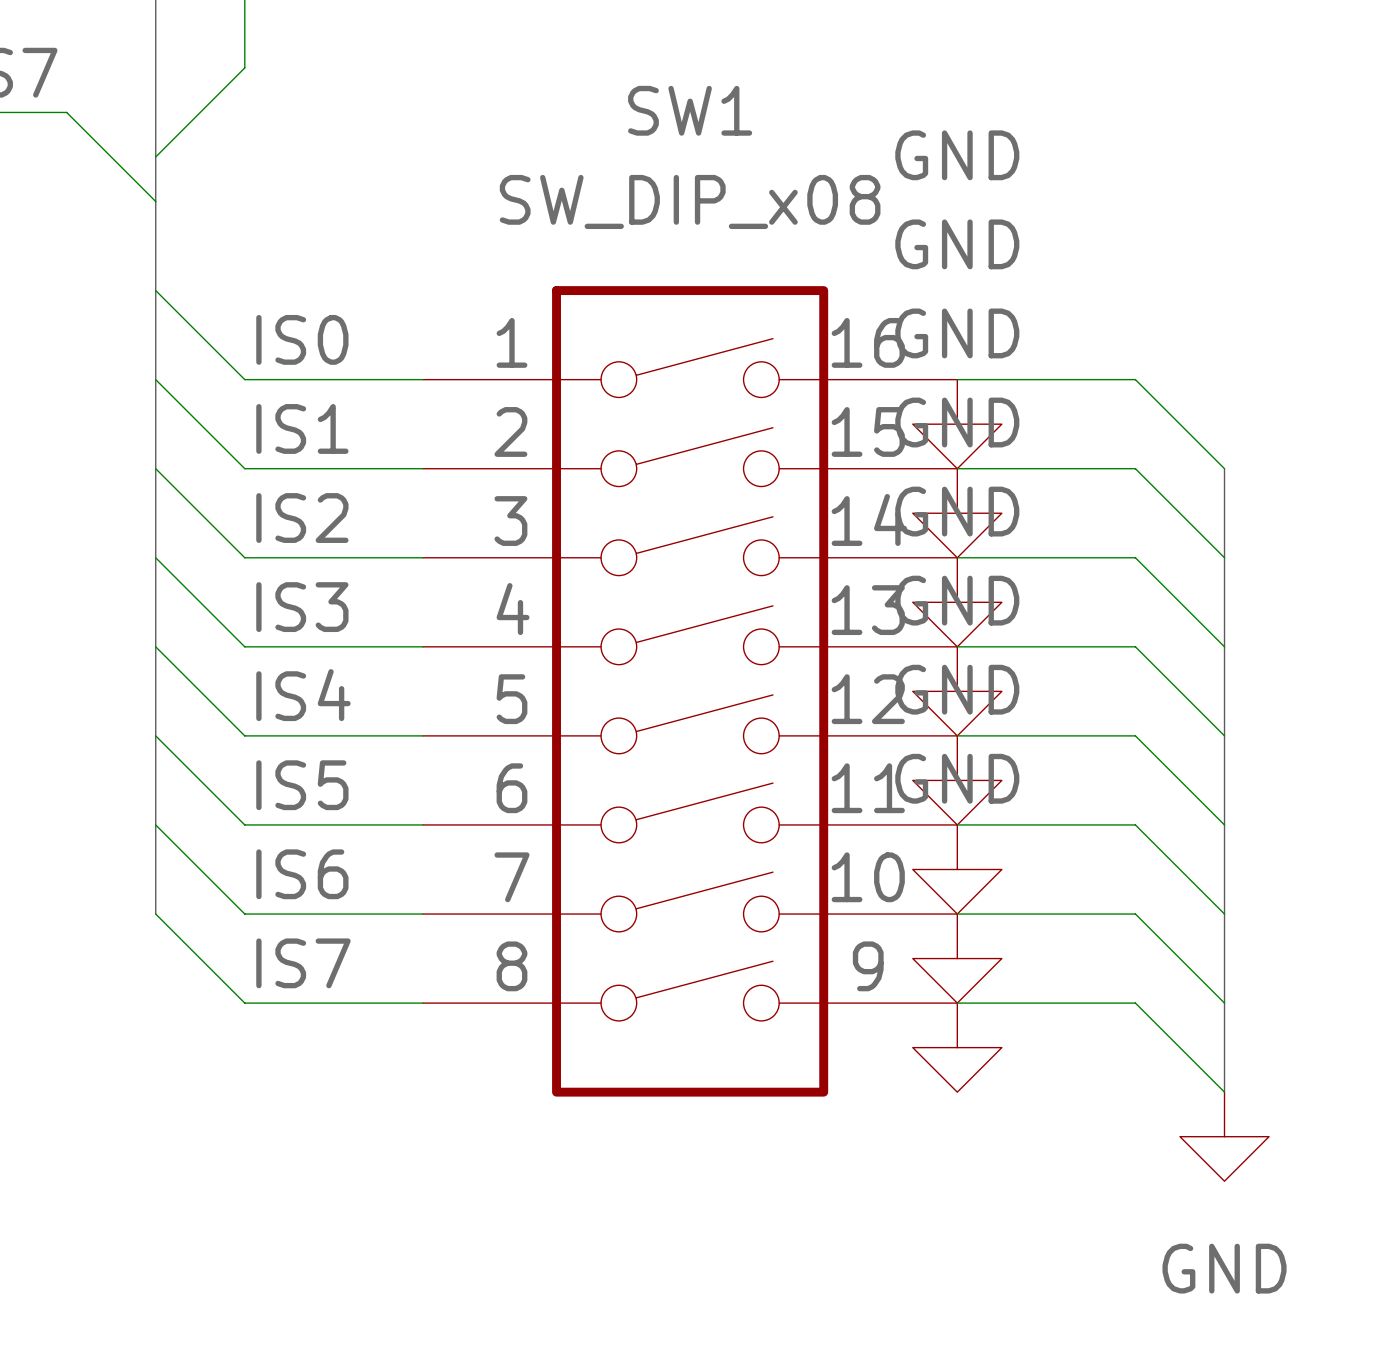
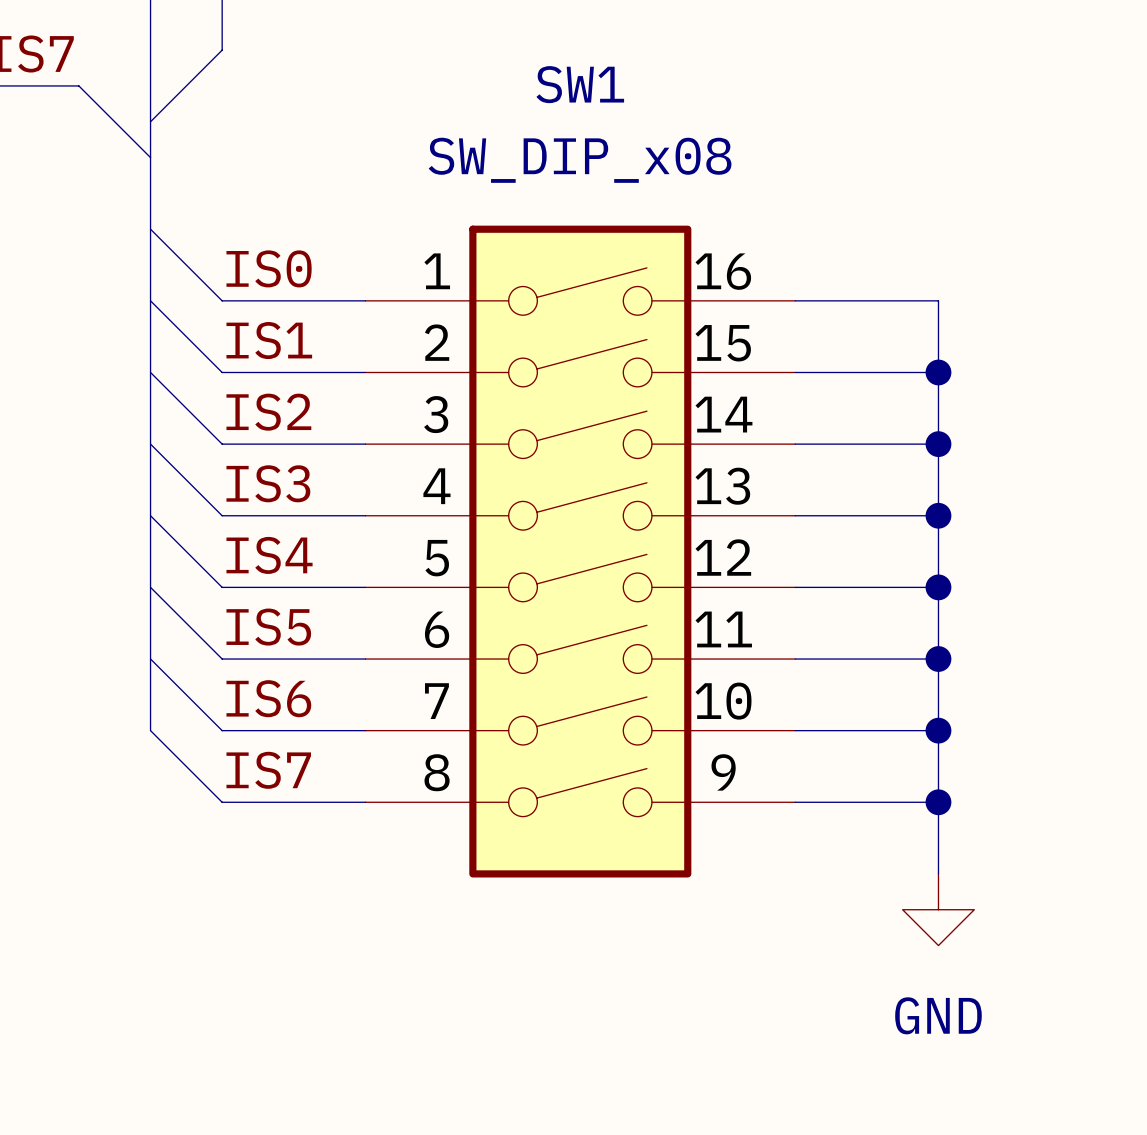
wire: (1135, 379) (1224, 468) -> (938, 300) (938, 873)
power symbol: GND (957, 424) -> none
wire: (1135, 468) (1224, 557) -> none
junction: none -> (938, 372)
bus: (1224, 468) (1224, 1092) -> none
power symbol: GND (957, 513) -> none
wire: (1135, 557) (1224, 646) -> none
junction: none -> (938, 444)
power symbol: GND (957, 602) -> none
wire: (1135, 646) (1224, 735) -> none
junction: none -> (938, 515)
power symbol: GND (957, 691) -> none
wire: (1135, 735) (1224, 824) -> none
junction: none -> (938, 587)
power symbol: GND (957, 780) -> none
wire: (1135, 824) (1224, 914) -> none
junction: none -> (938, 659)
power symbol: GND (957, 869) -> none
wire: (1135, 914) (1224, 1003) -> none
junction: none -> (938, 730)
power symbol: GND (957, 958) -> none
wire: (1135, 1003) (1224, 1092) -> none
junction: none -> (938, 802)
power symbol: GND (957, 1047) -> none
power symbol position: GND (1224, 1136) -> GND (938, 909)

